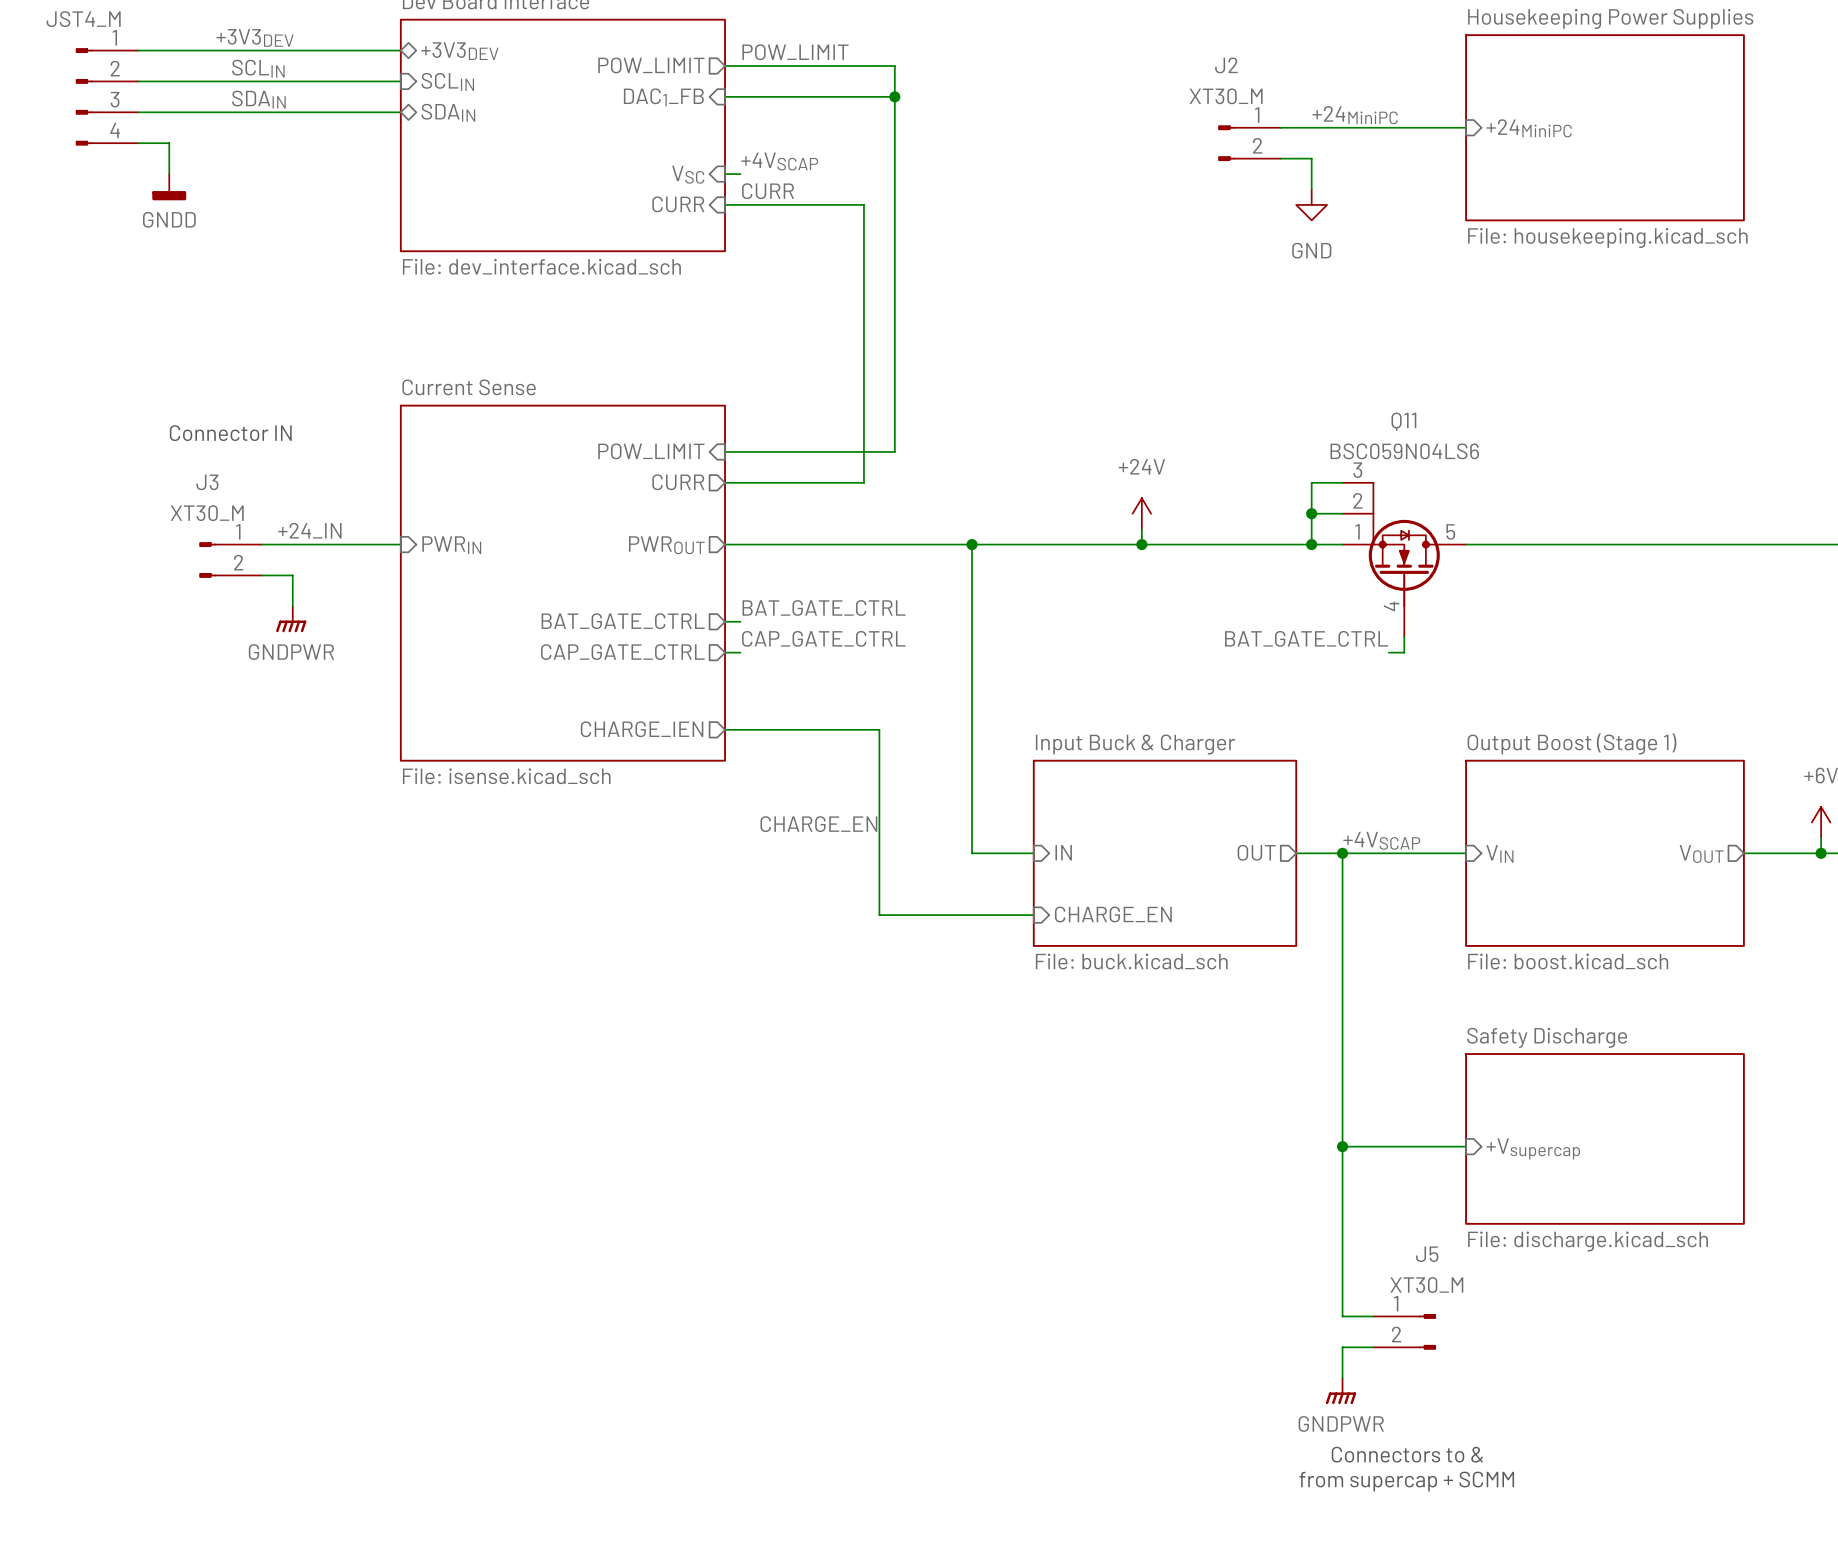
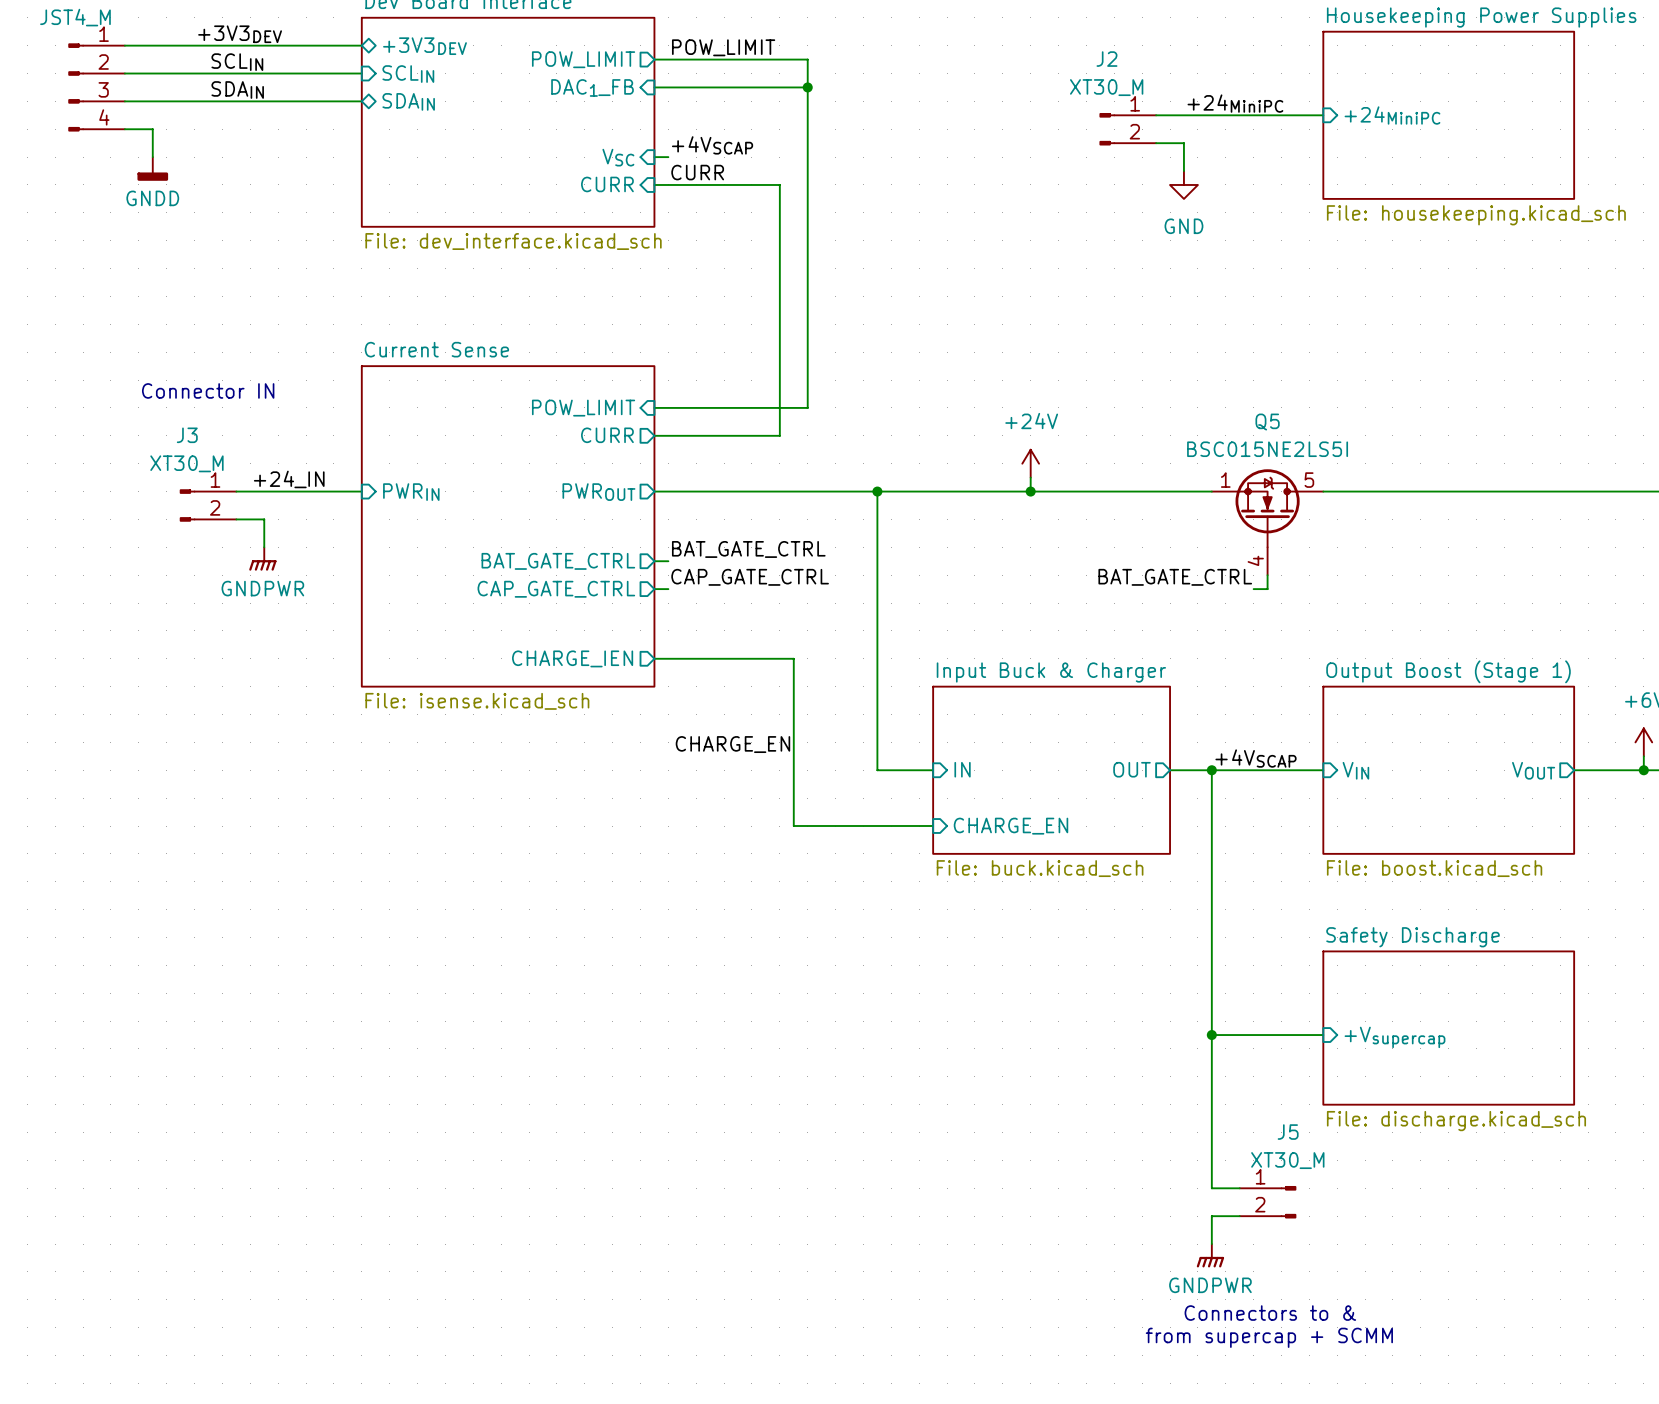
wire: (1342, 482) (1311, 482) (1311, 544) -> none
wire: (1311, 513) (1342, 513) -> none
junction: (1311, 513) -> none
junction: (1311, 544) -> none
Q11: BSC059N04LS6 (1404, 560) -> none
Q5: none -> BSC015NE2LS5I (1267, 522)

